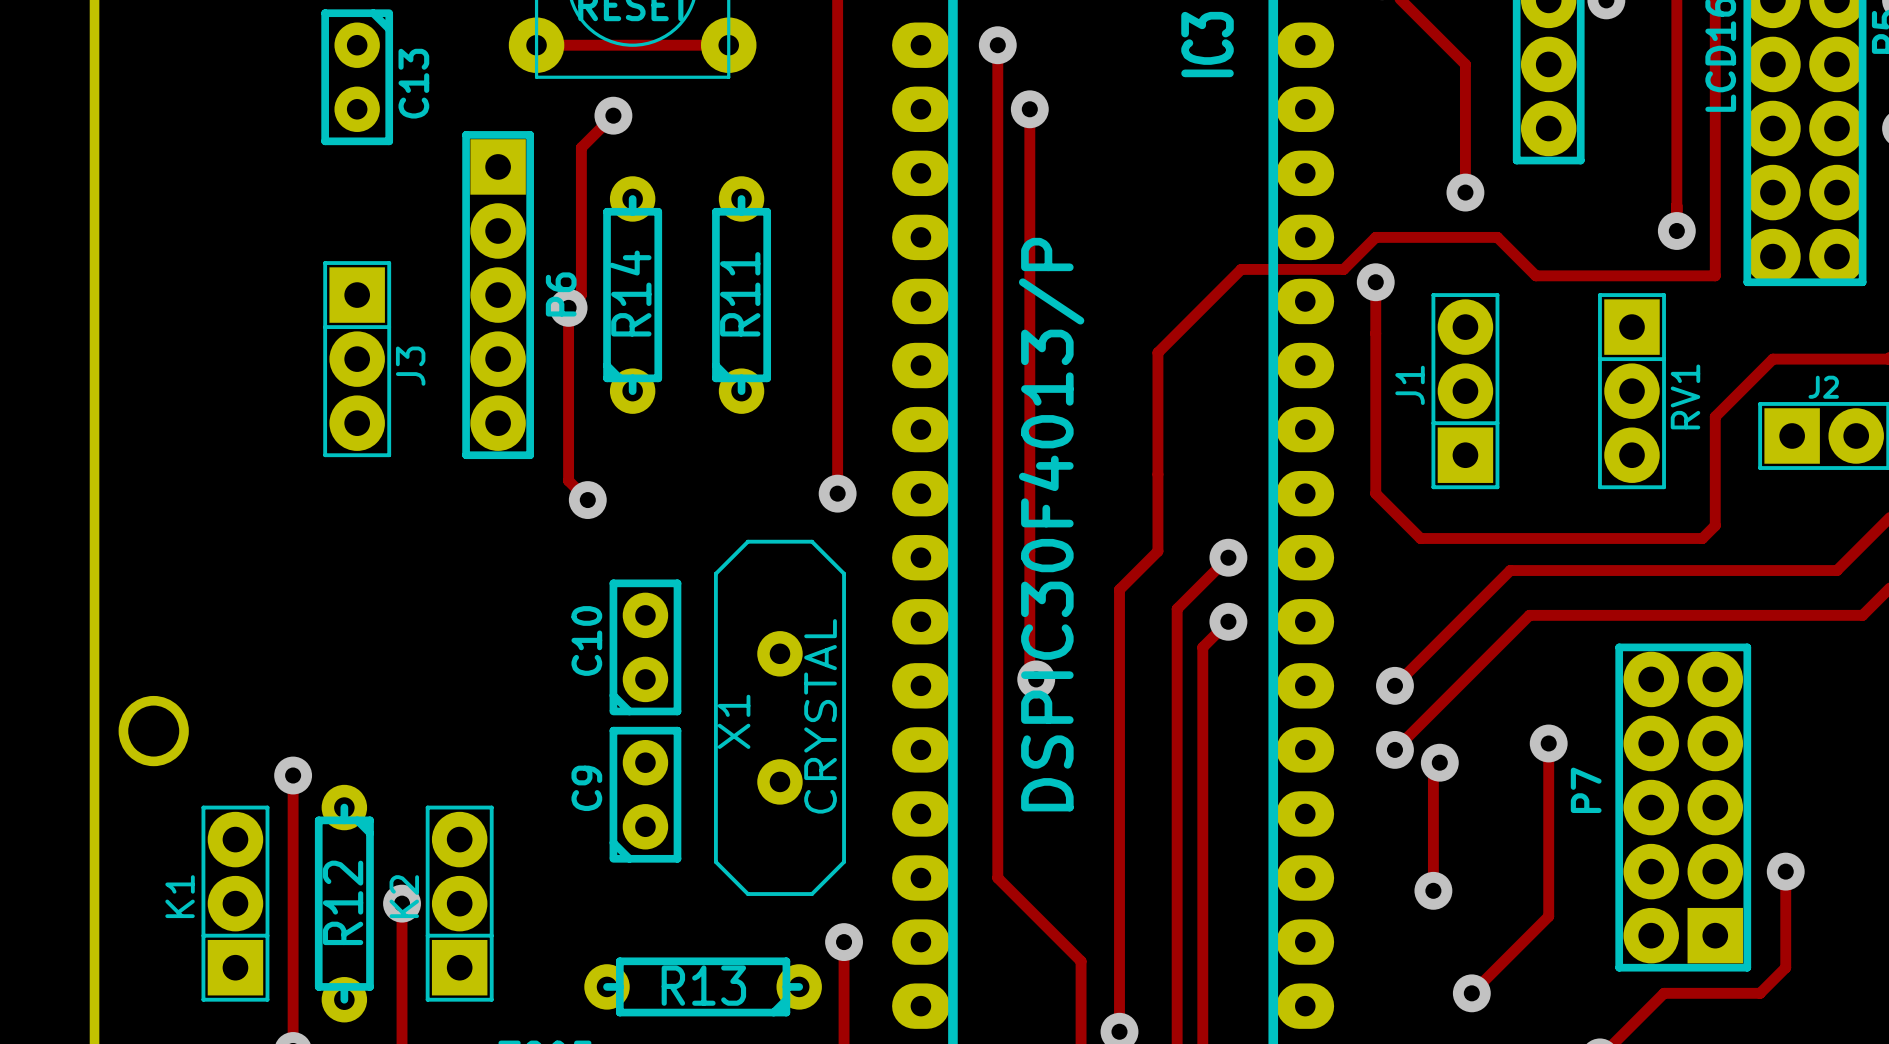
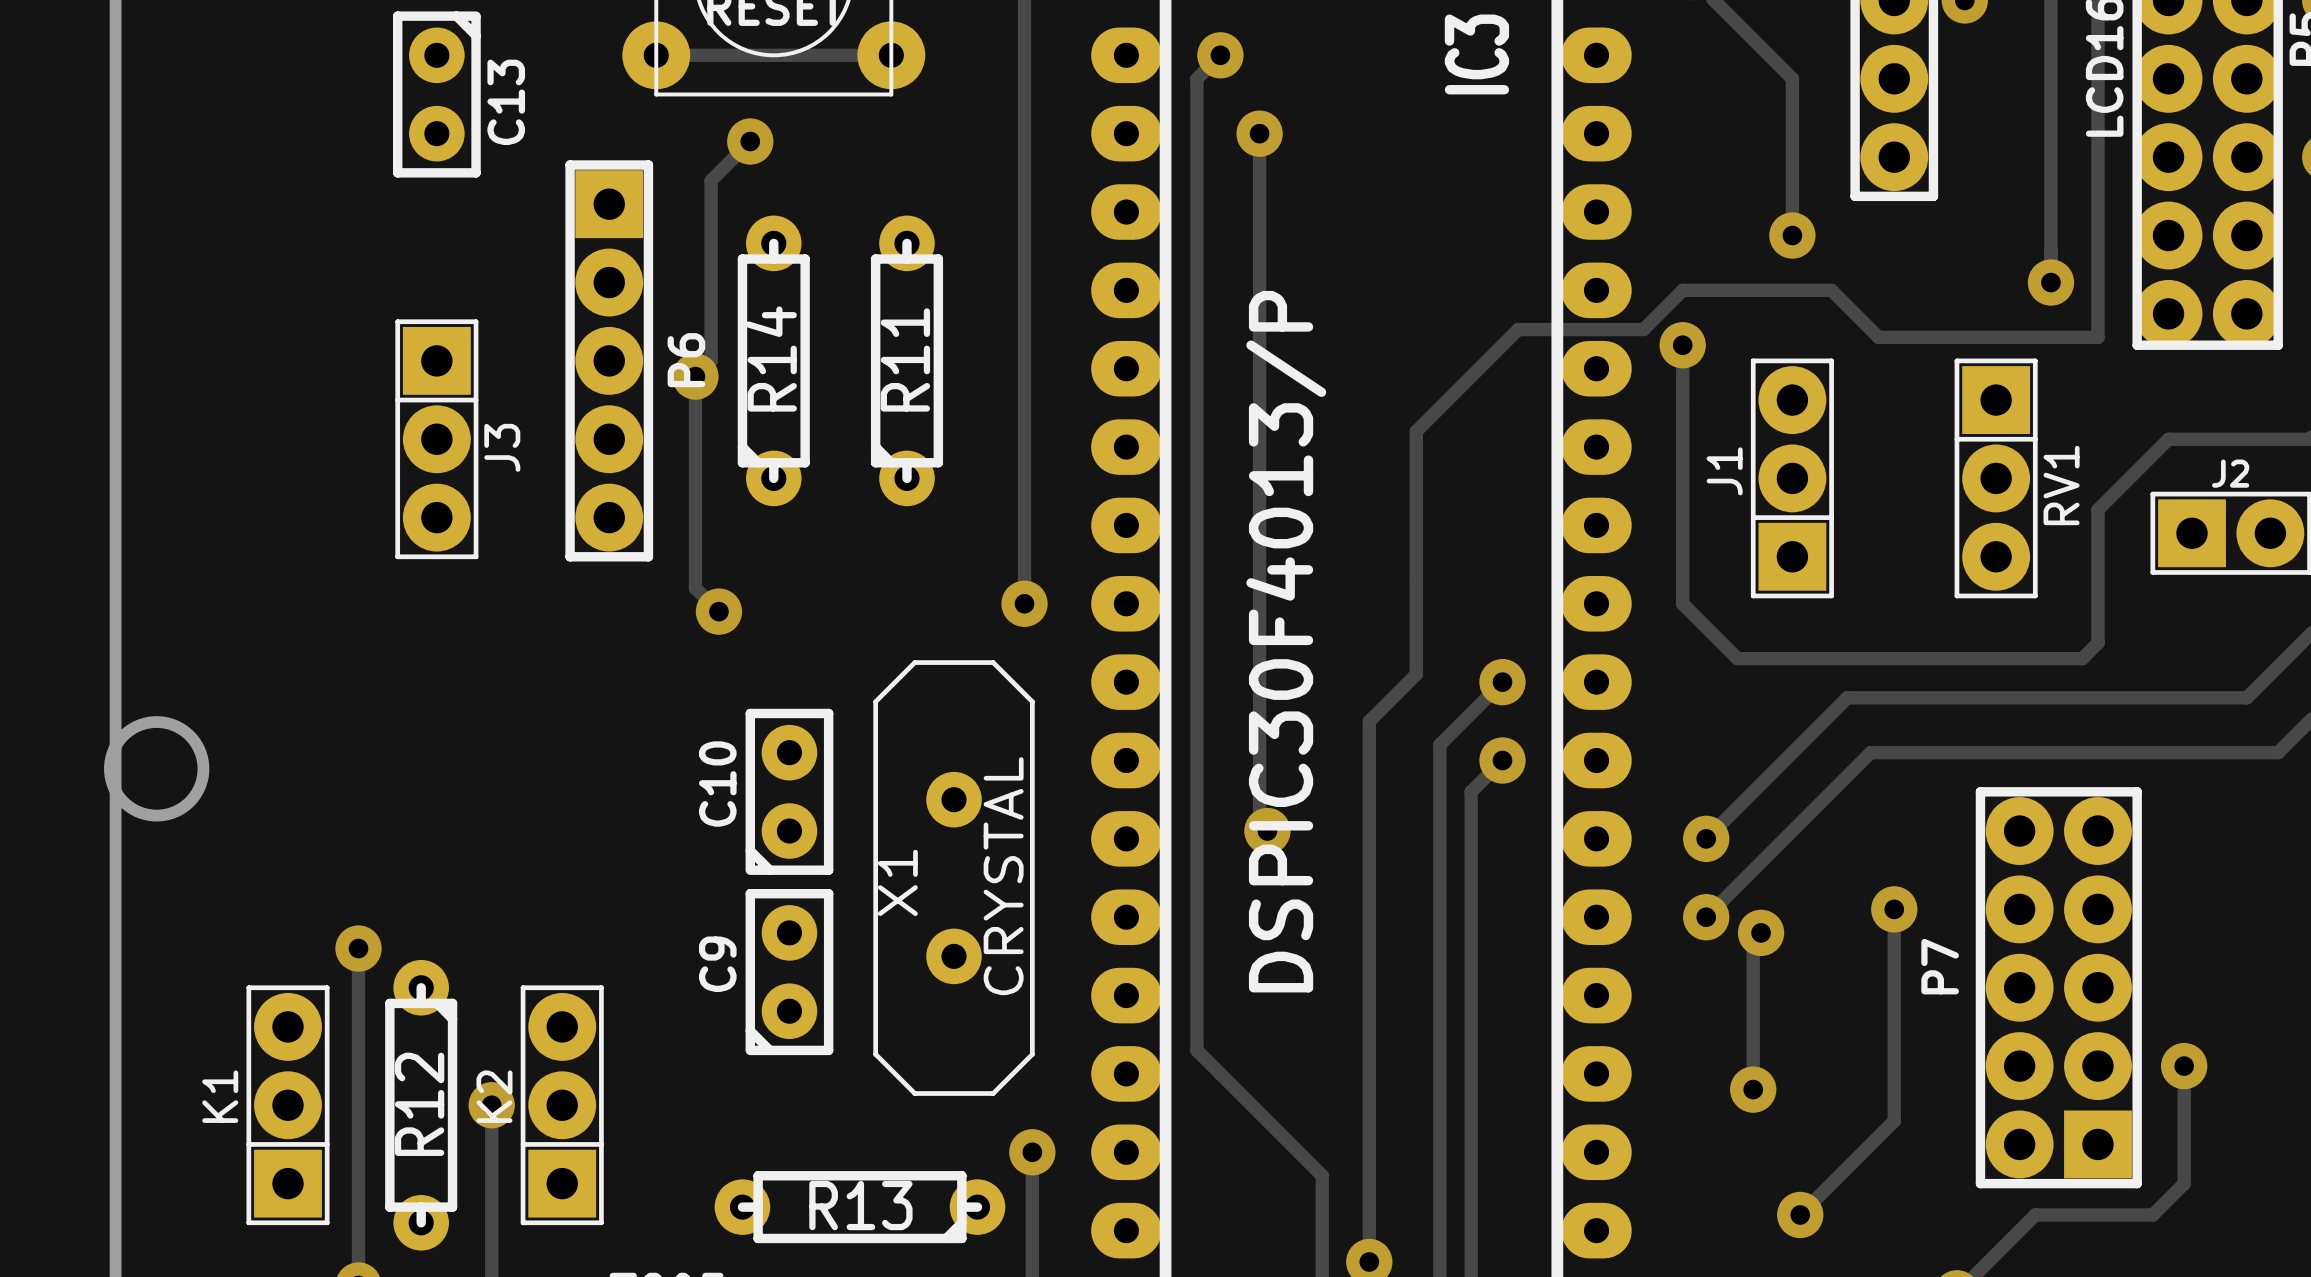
track: (997, 45) (997, 878) -> (1220, 55) (1196, 78) (1196, 1050) (1220, 1073)
round board edge: none -> [104, 716, 210, 822]
round board edge: [118, 695, 189, 767] -> none

